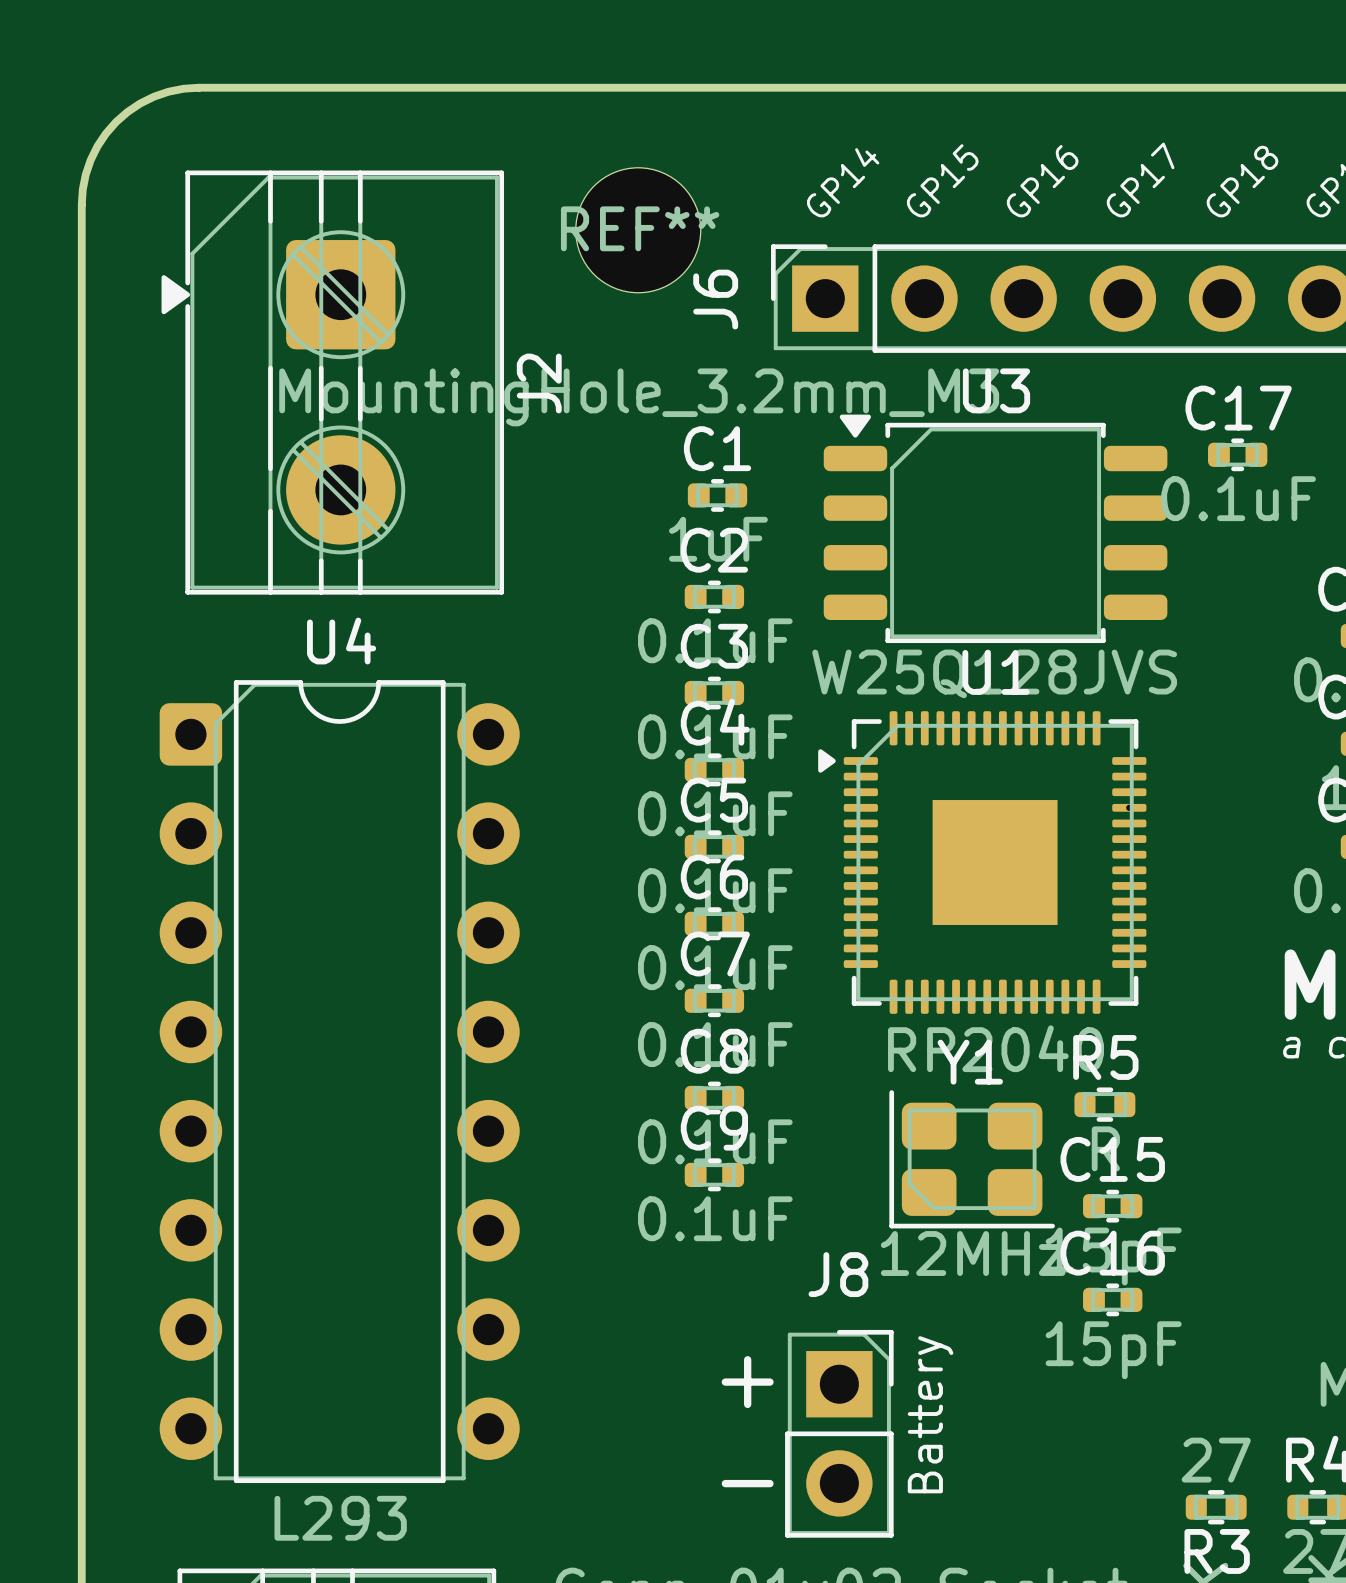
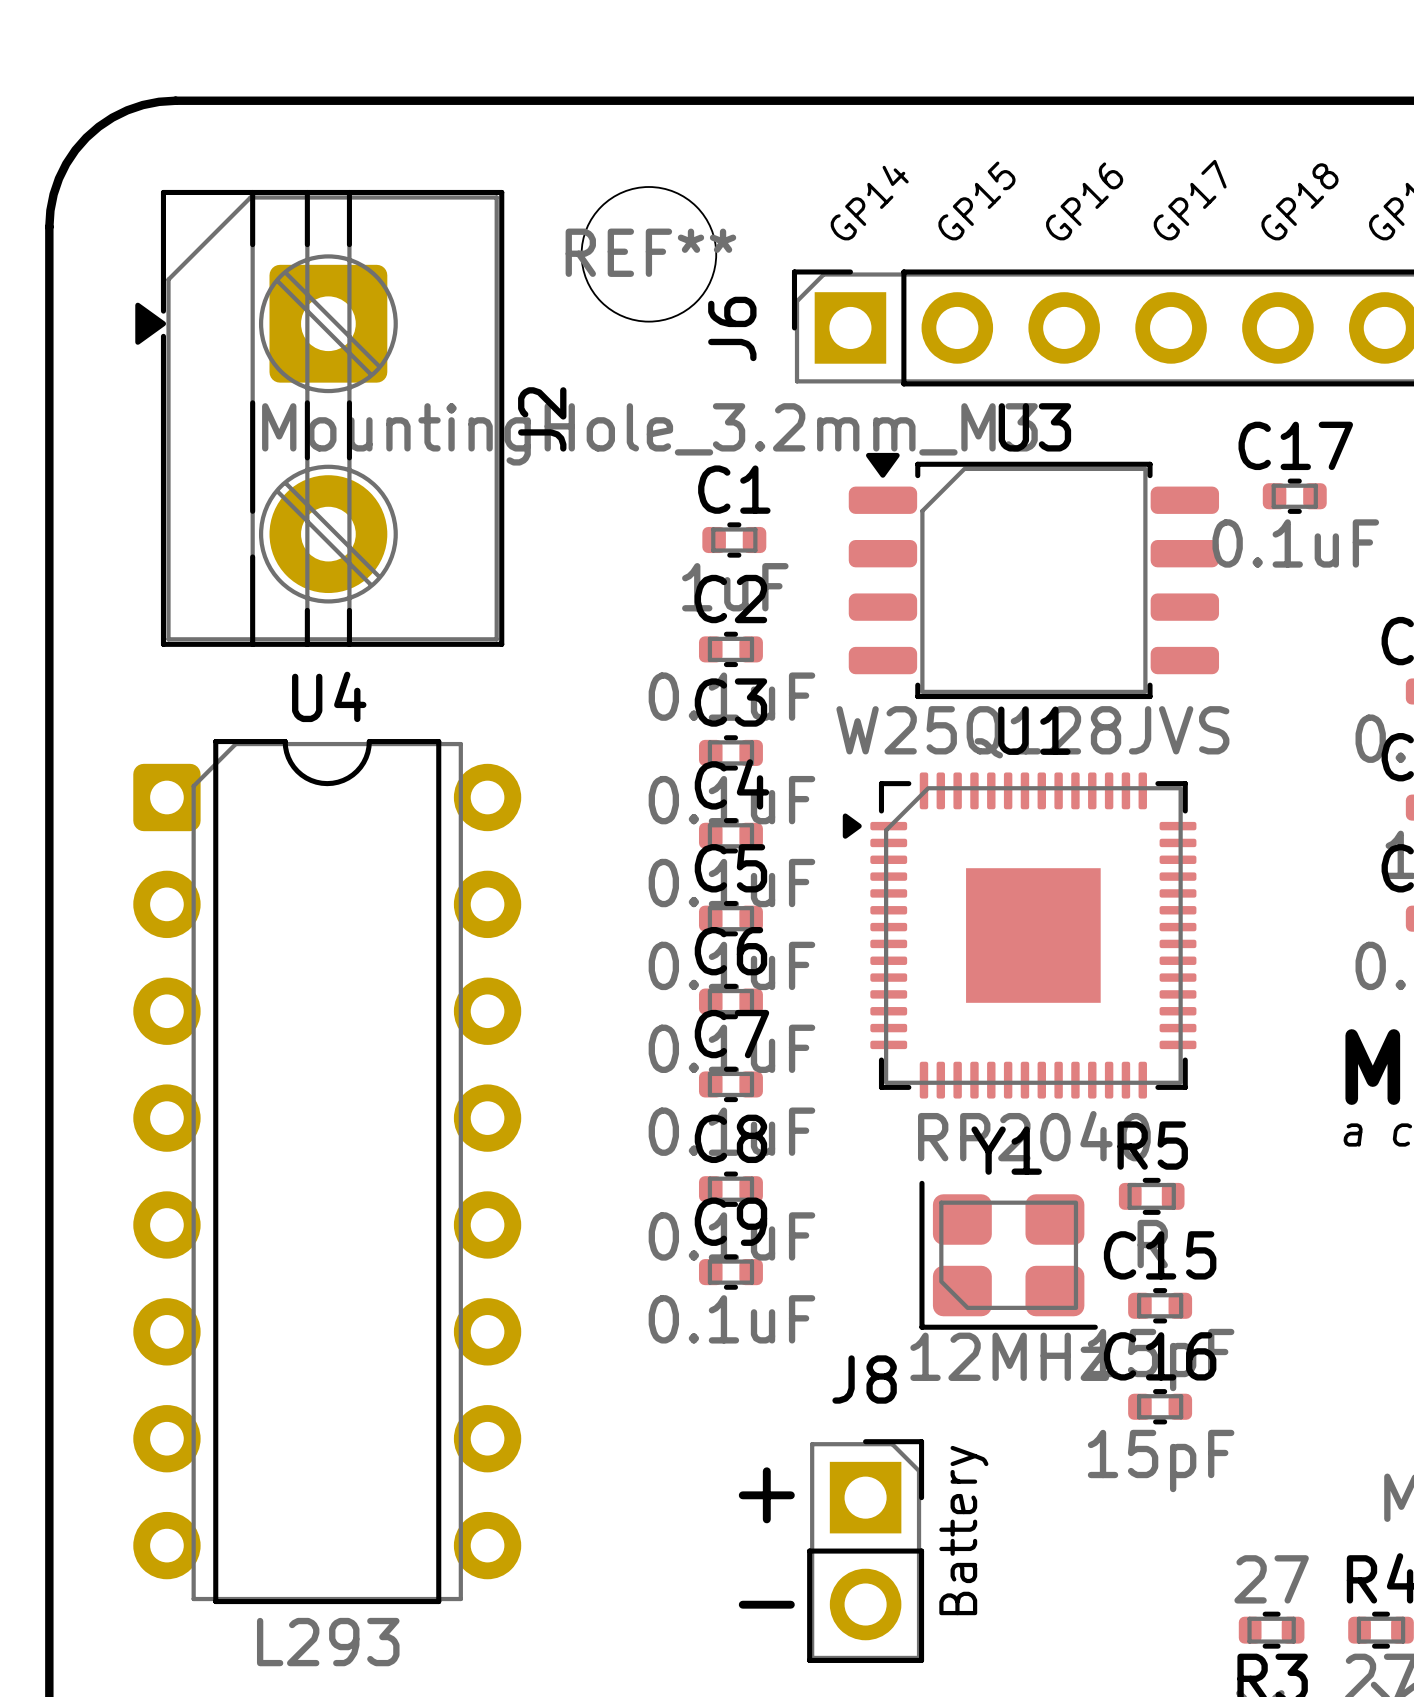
U1 footprint: [818, 711, 1147, 1014] -> [842, 772, 1197, 1099]

